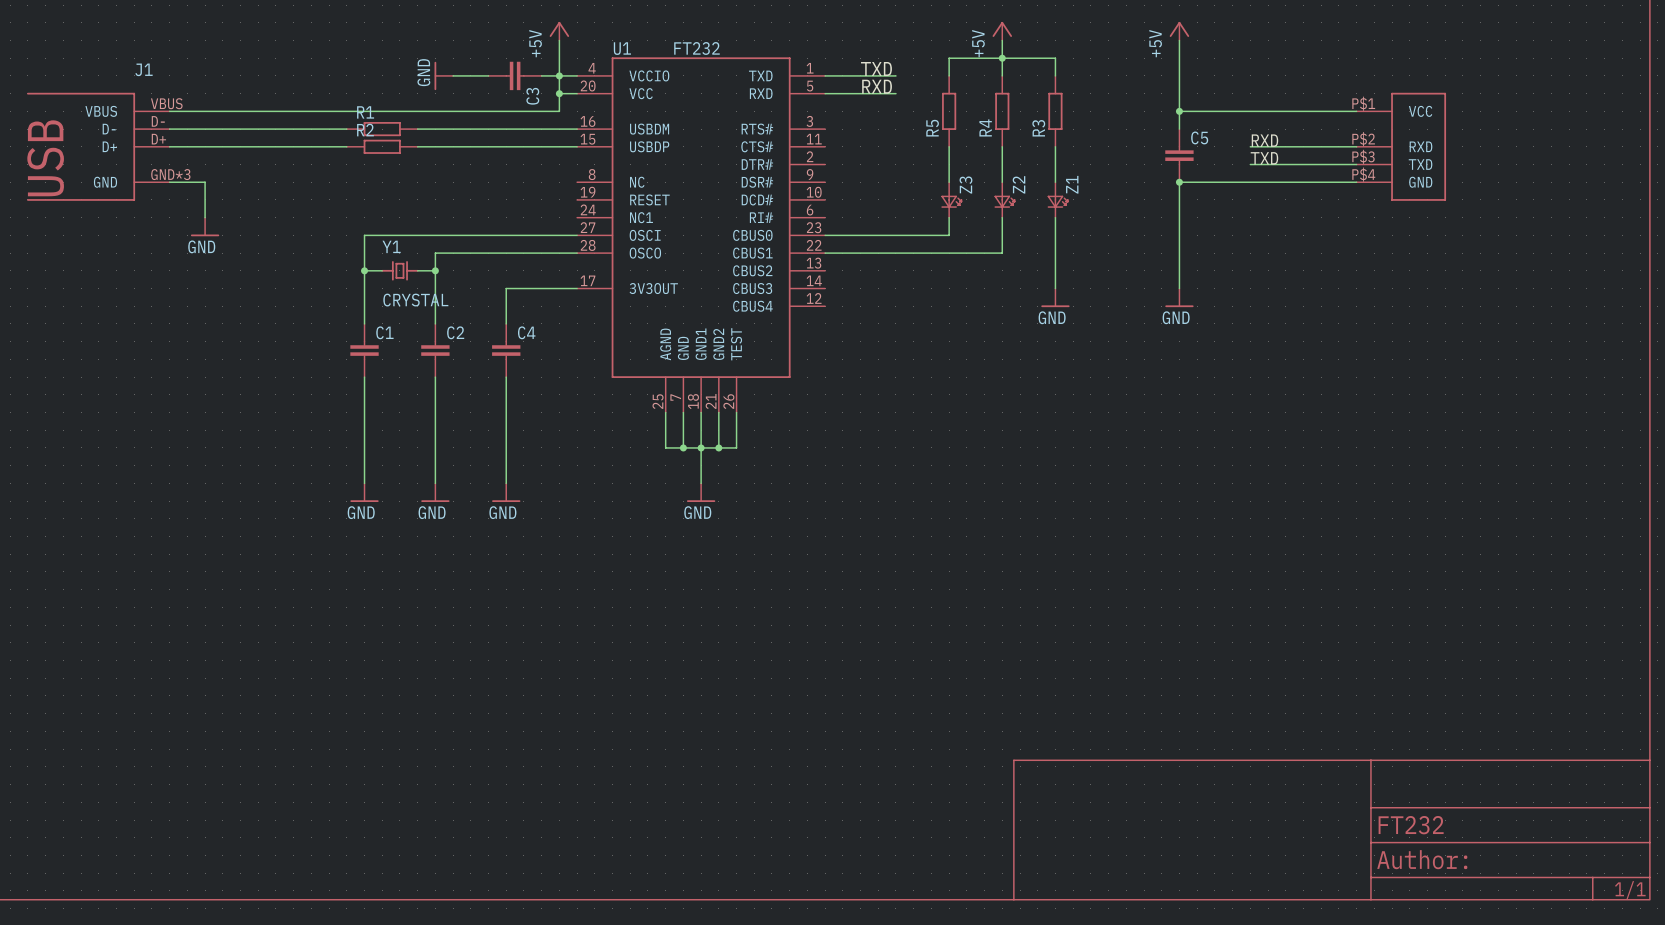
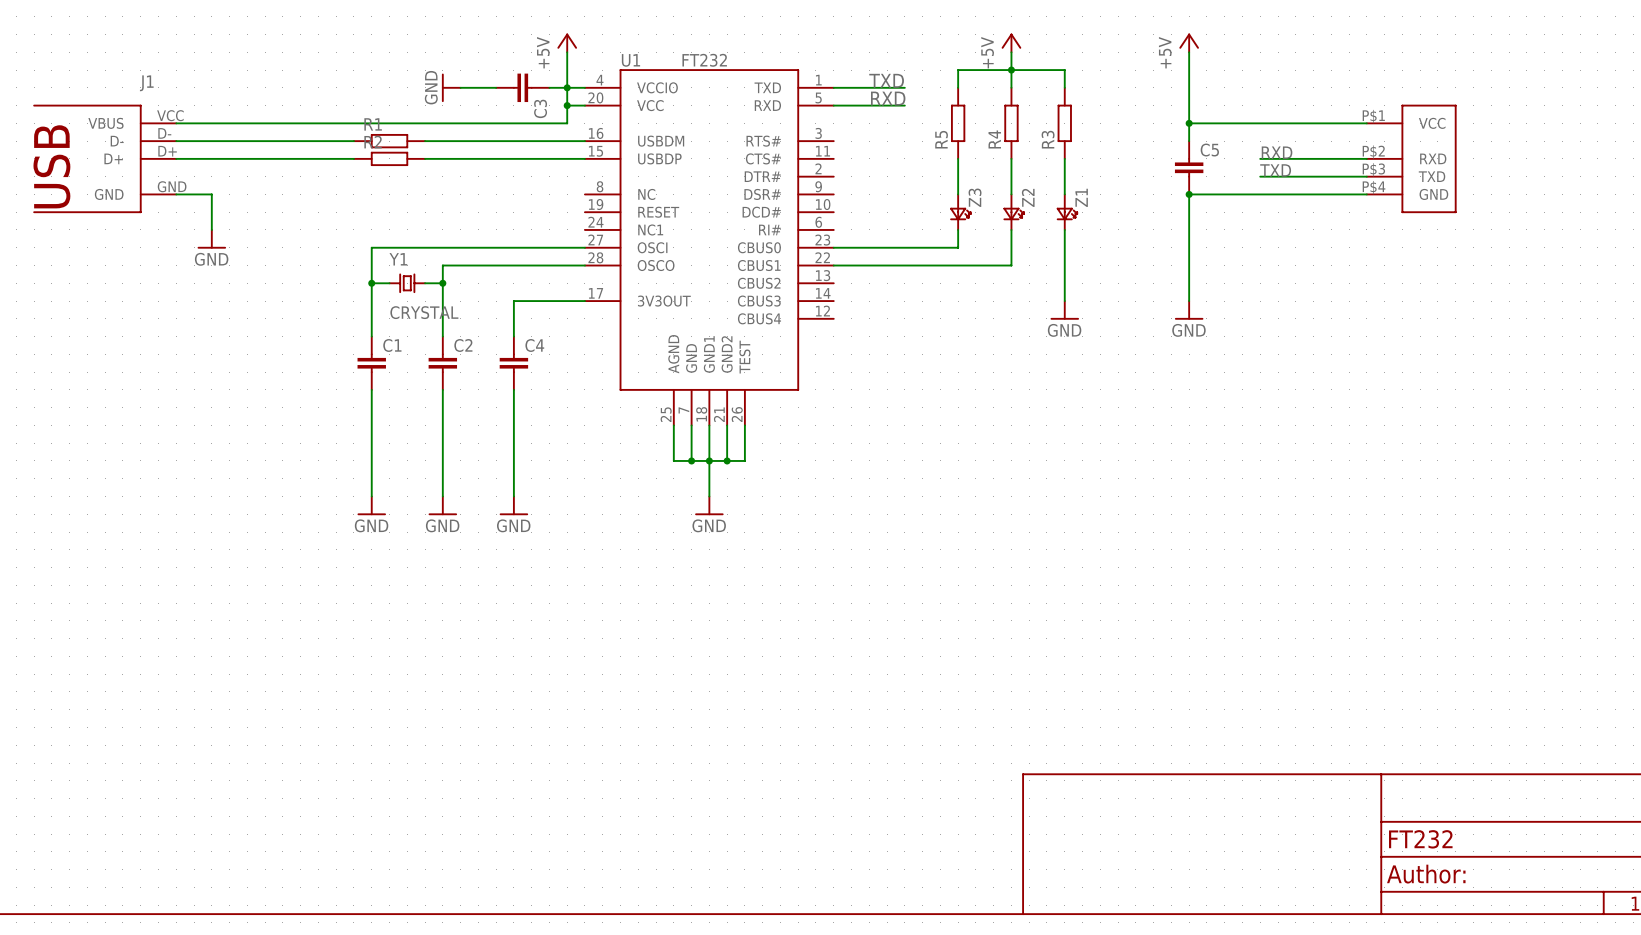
J1 pin number: VBUS (166, 103) -> VCC (170, 115)
J1 pin number: GND*3 (170, 174) -> GND (172, 186)

